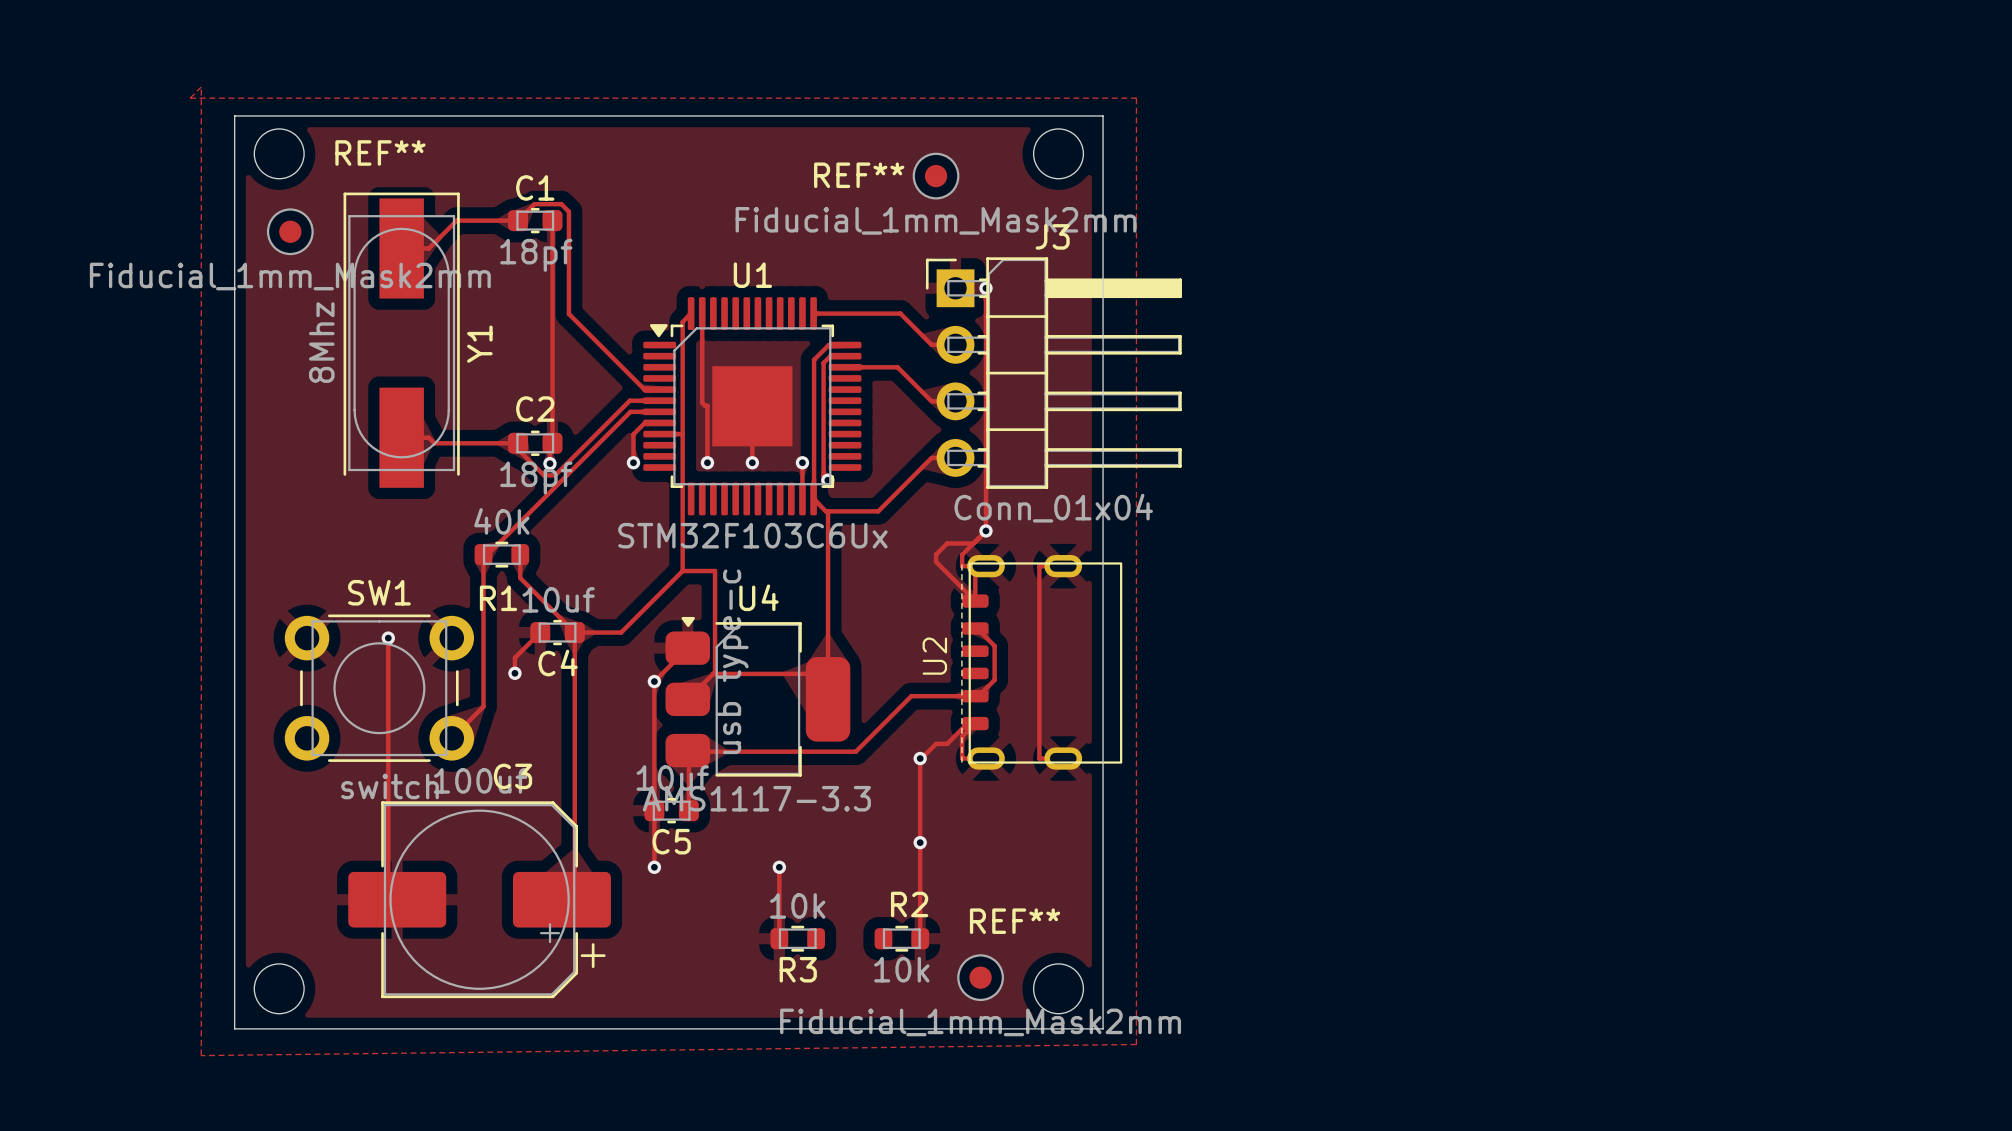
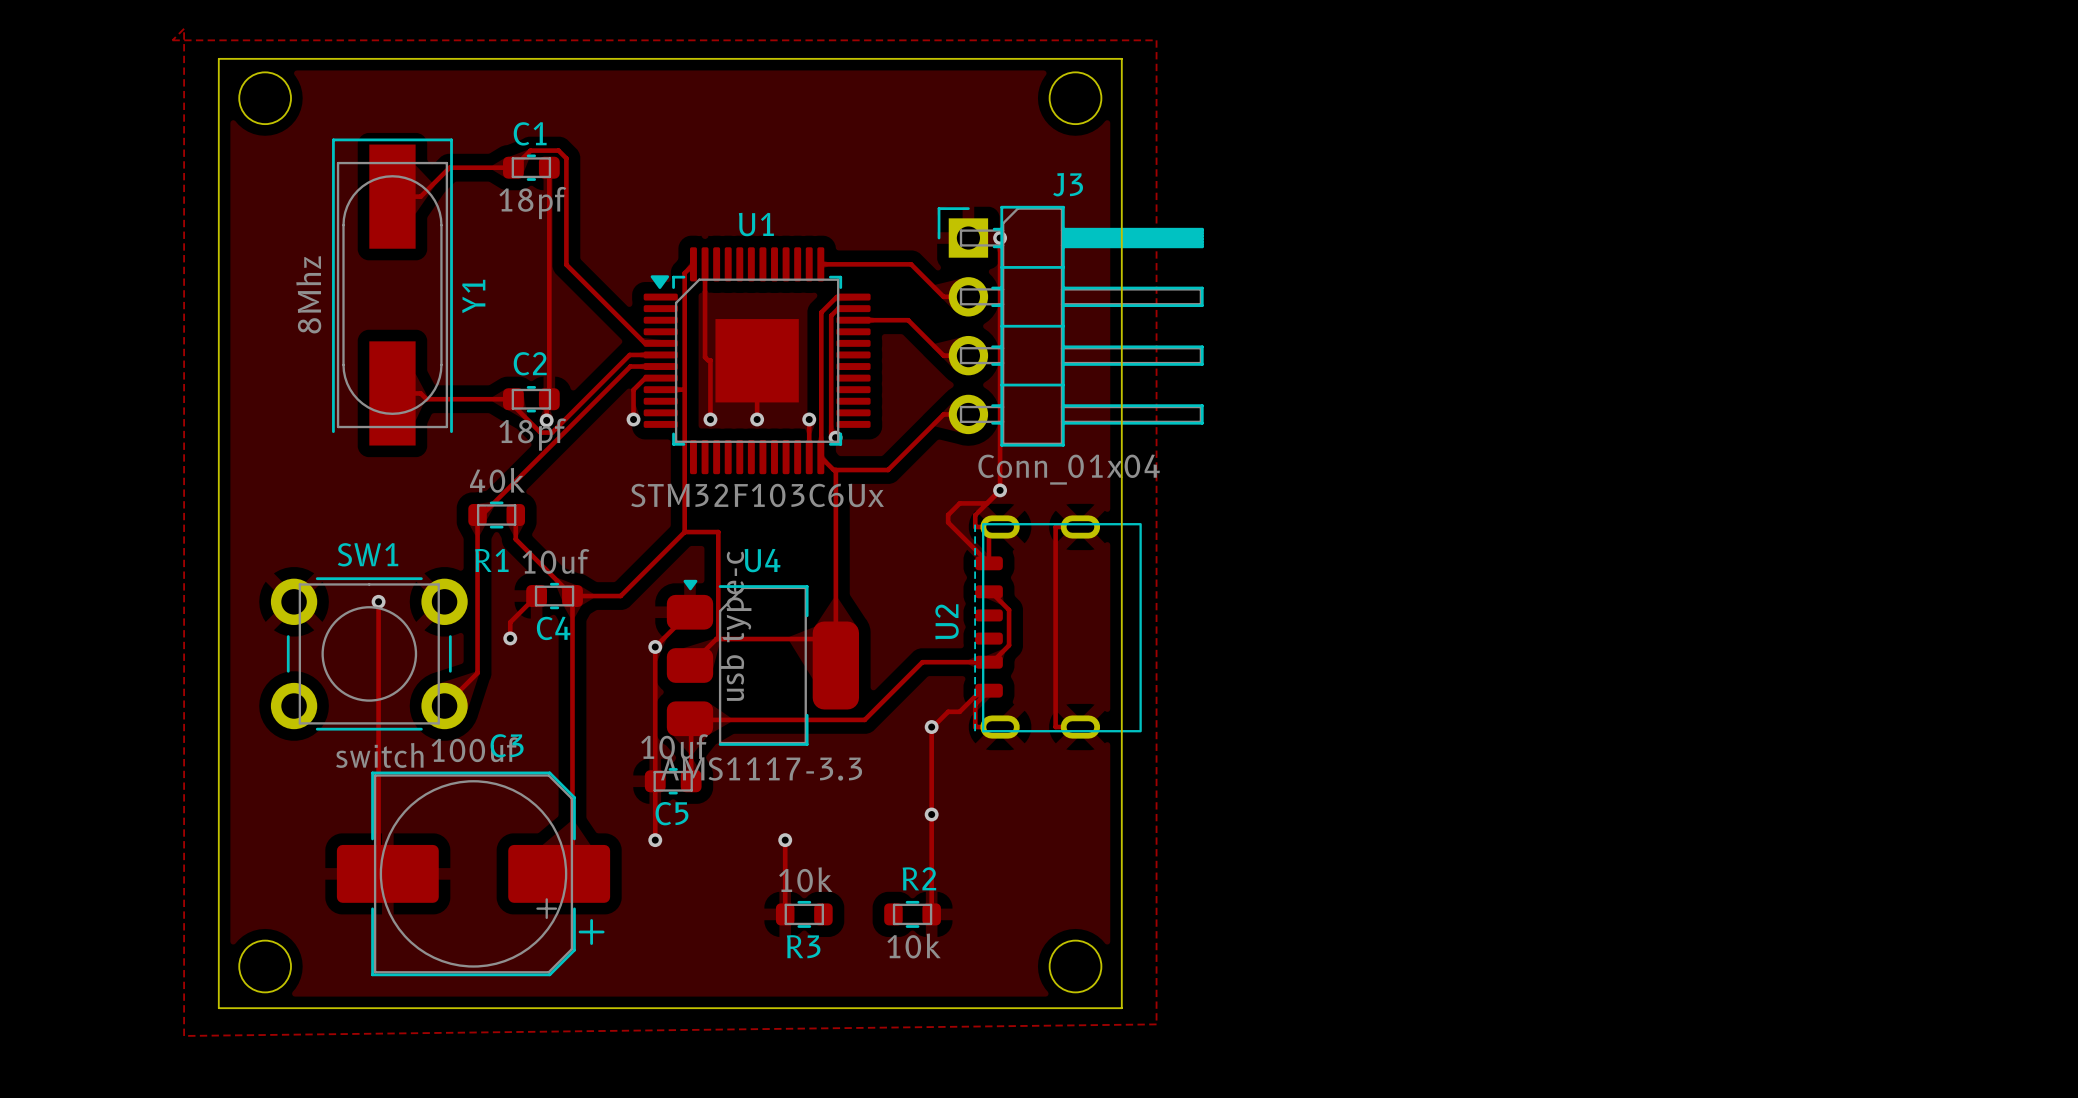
REF**: Fiducial_1mm_Mask2mm (936, 176) -> none
REF**: Fiducial_1mm_Mask2mm (290, 231) -> none
REF**: Fiducial_1mm_Mask2mm (980, 977) -> none

